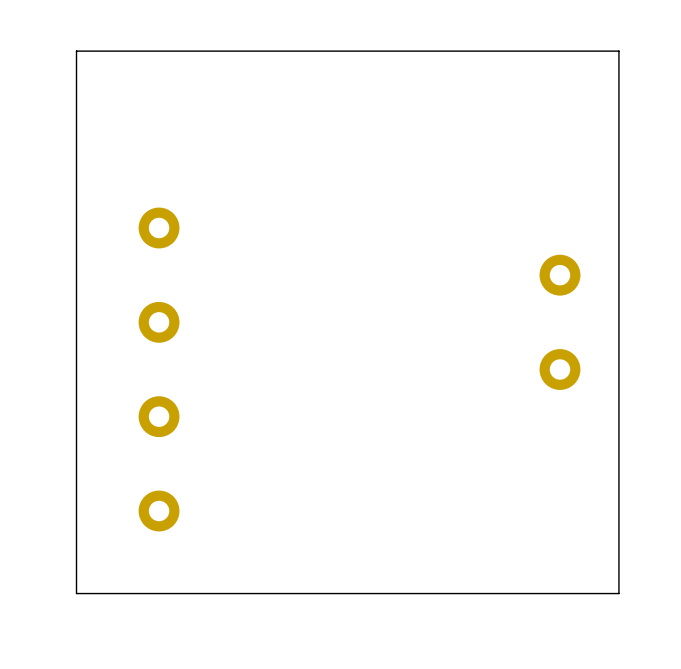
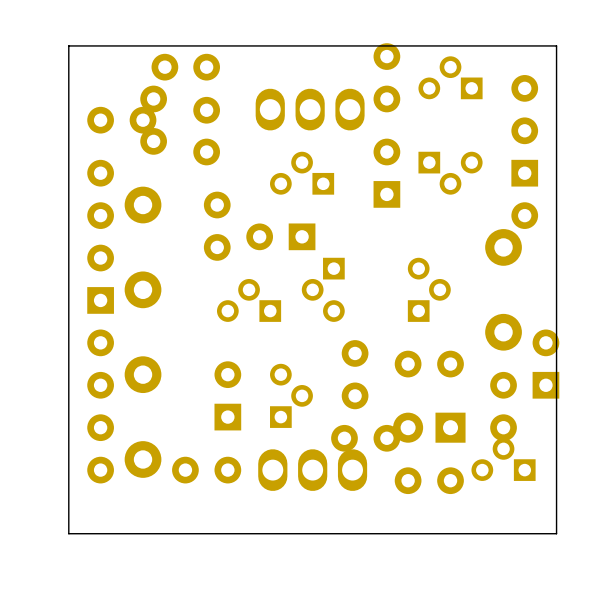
part: none -> (185, 67)
part: none -> (386, 77)
part: none -> (450, 77)
part: none -> (310, 109)
part: none -> (524, 109)
part: none -> (121, 120)
part: none -> (153, 120)
part: none -> (206, 131)
part: none -> (302, 173)
part: none -> (386, 173)
part: none -> (450, 173)
part: none -> (100, 194)
part: none -> (524, 194)
part: none -> (217, 226)
part: none -> (280, 236)
part: none -> (100, 279)
part: none -> (323, 289)
part: none -> (429, 289)
part: none -> (249, 300)
part: none -> (100, 364)
part: none -> (429, 364)
part: none -> (545, 364)
part: none -> (355, 374)
part: none -> (227, 395)
part: none -> (291, 395)
part: none -> (503, 406)
part: none -> (429, 427)
part: none -> (365, 438)
part: none -> (100, 448)
part: none -> (503, 459)
part: none -> (206, 470)
part: none -> (312, 470)
part: none -> (429, 480)

